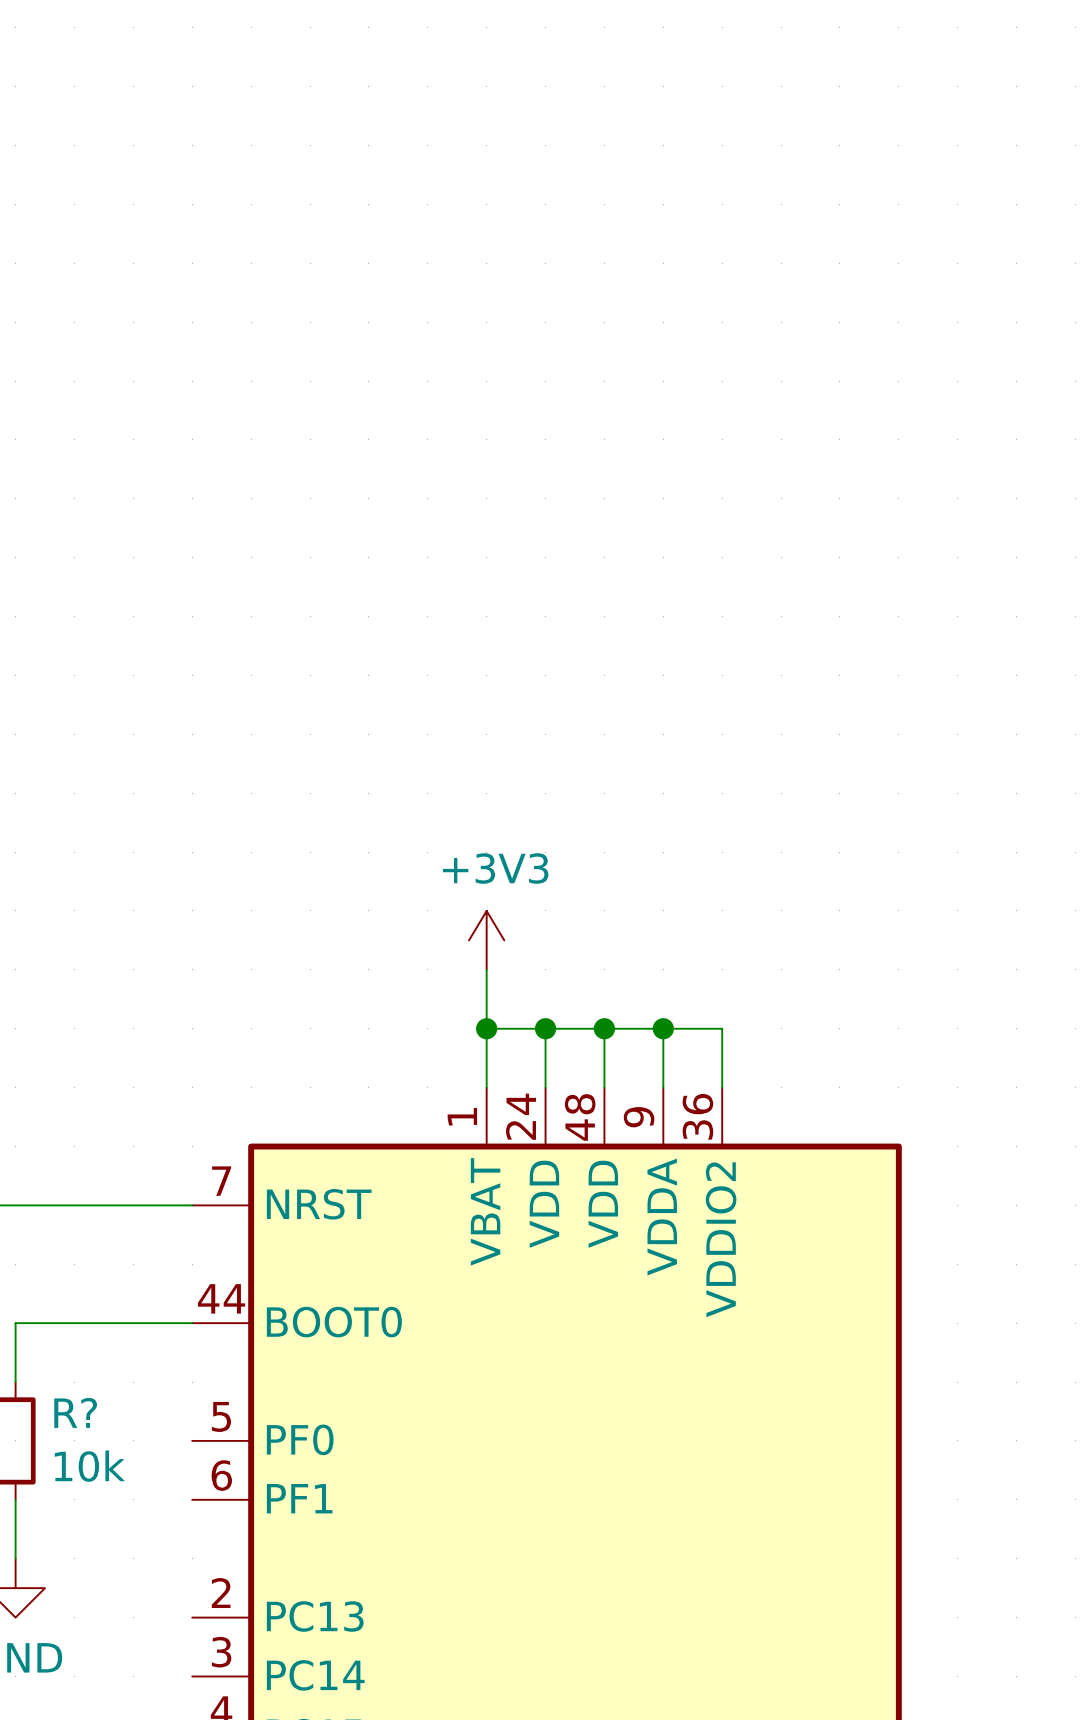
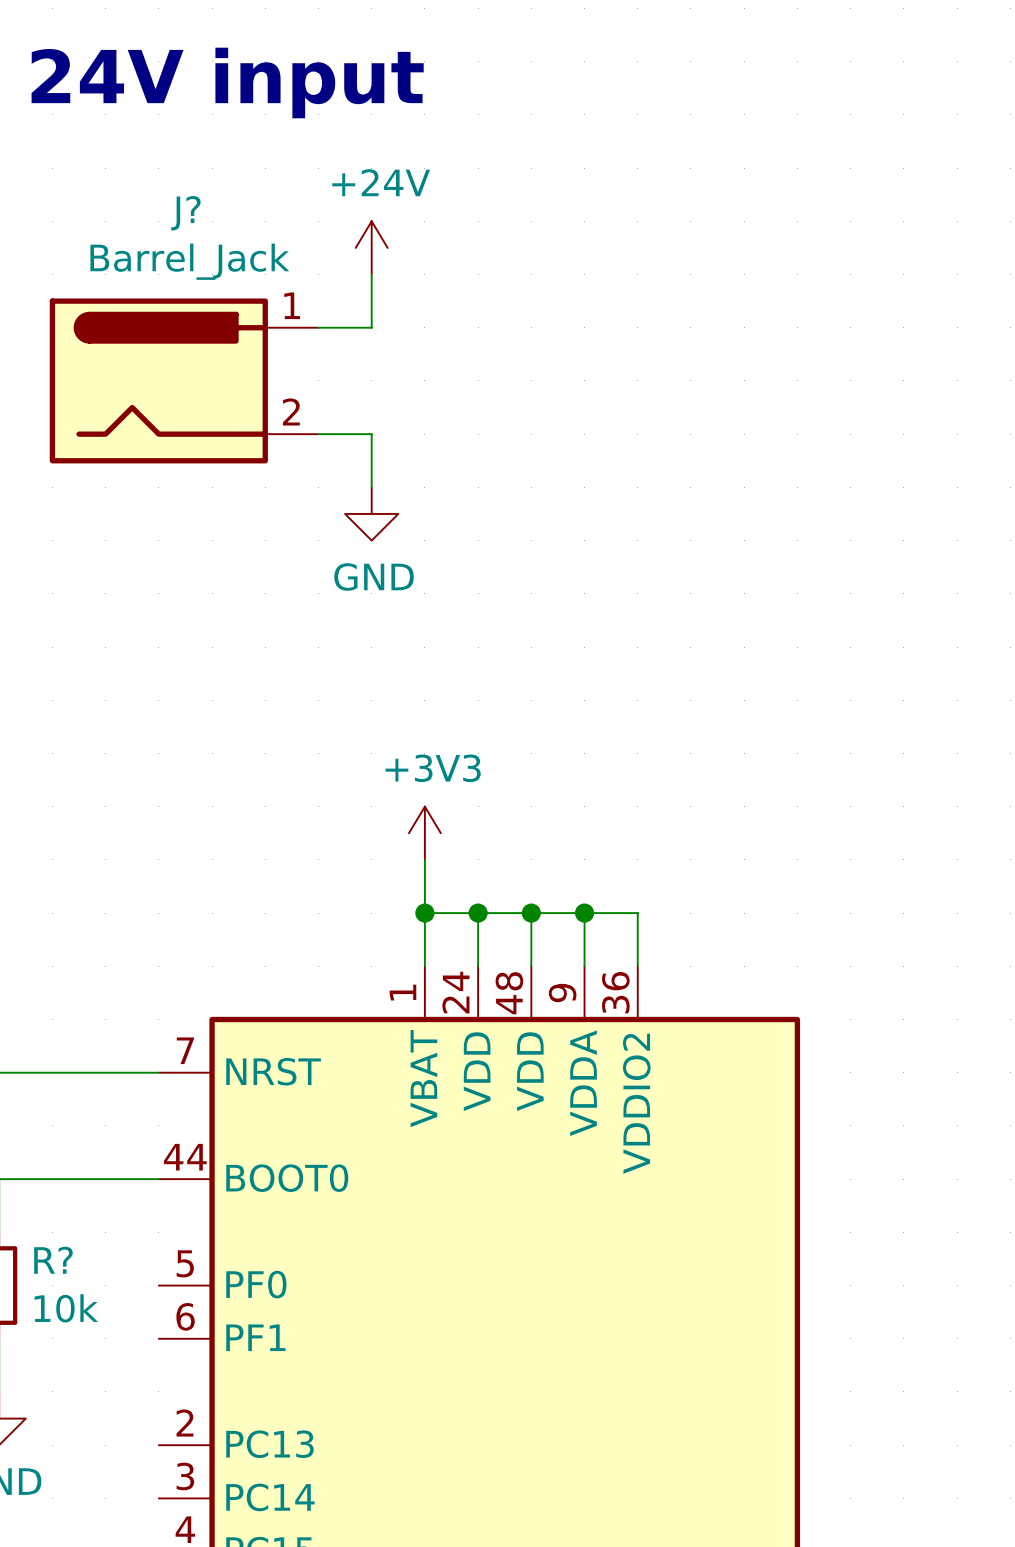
text: none -> 24V input (227, 82)
power symbol: none -> +24V (371, 247)
wire: none -> (371, 274) (371, 327) (318, 327)
J?: none -> Barrel_Jack (184, 380)
wire: none -> (318, 434) (371, 434) (371, 487)
power symbol: none -> GND (371, 513)

